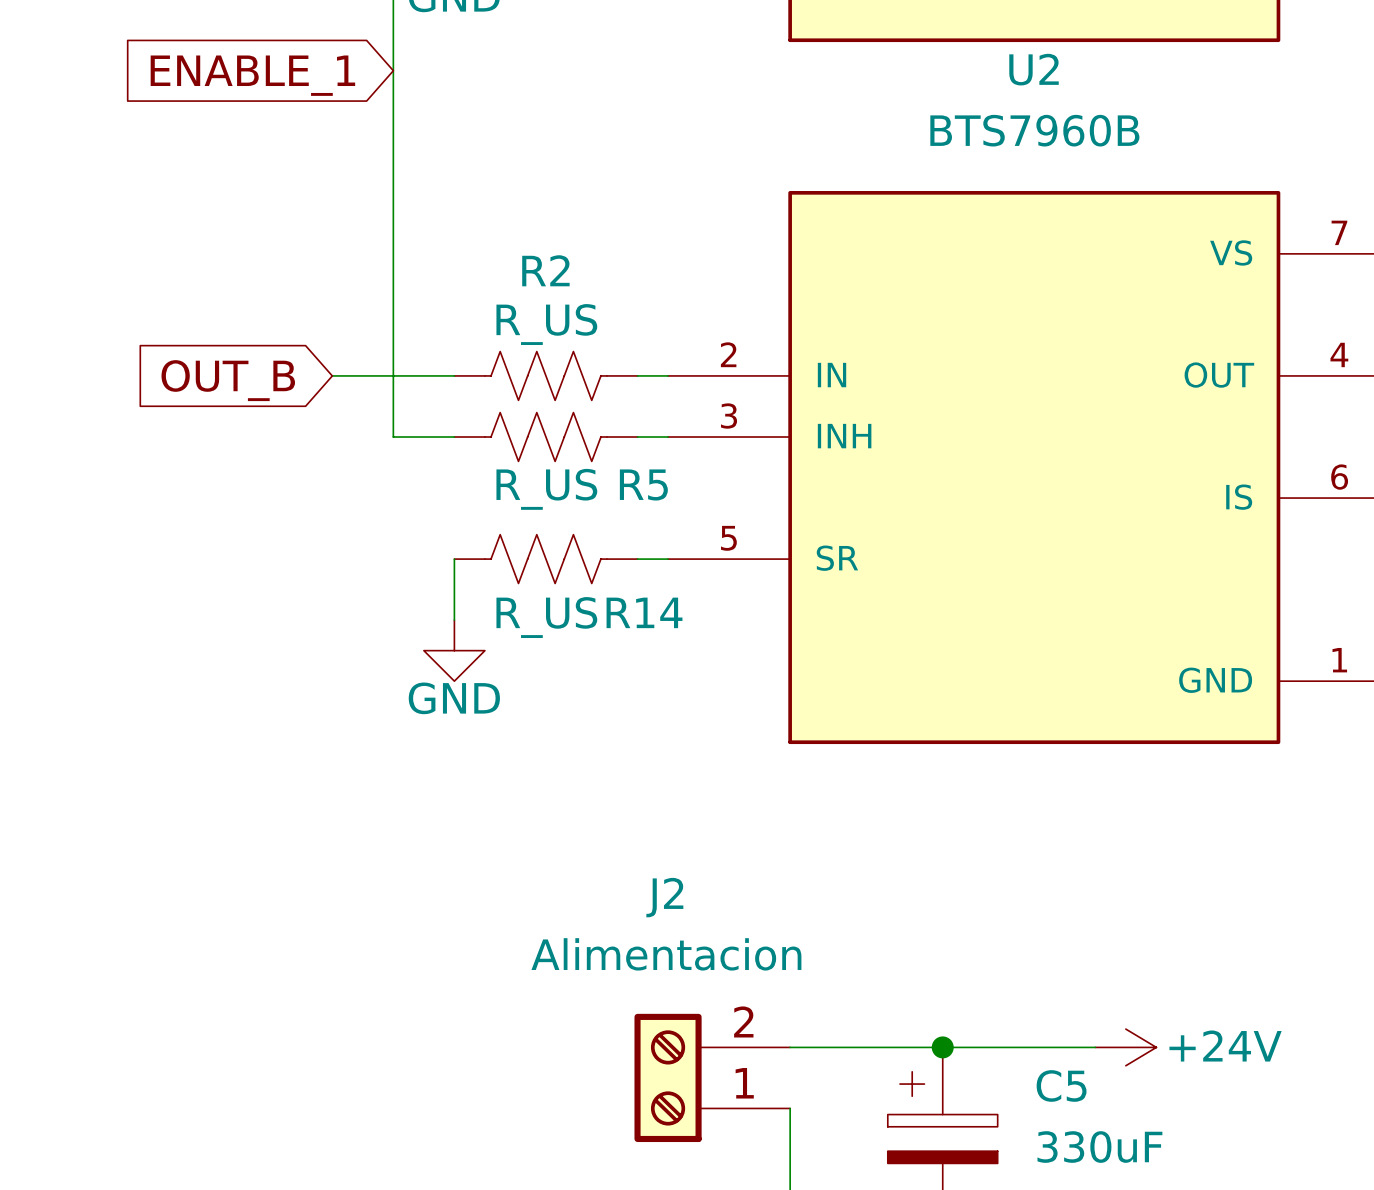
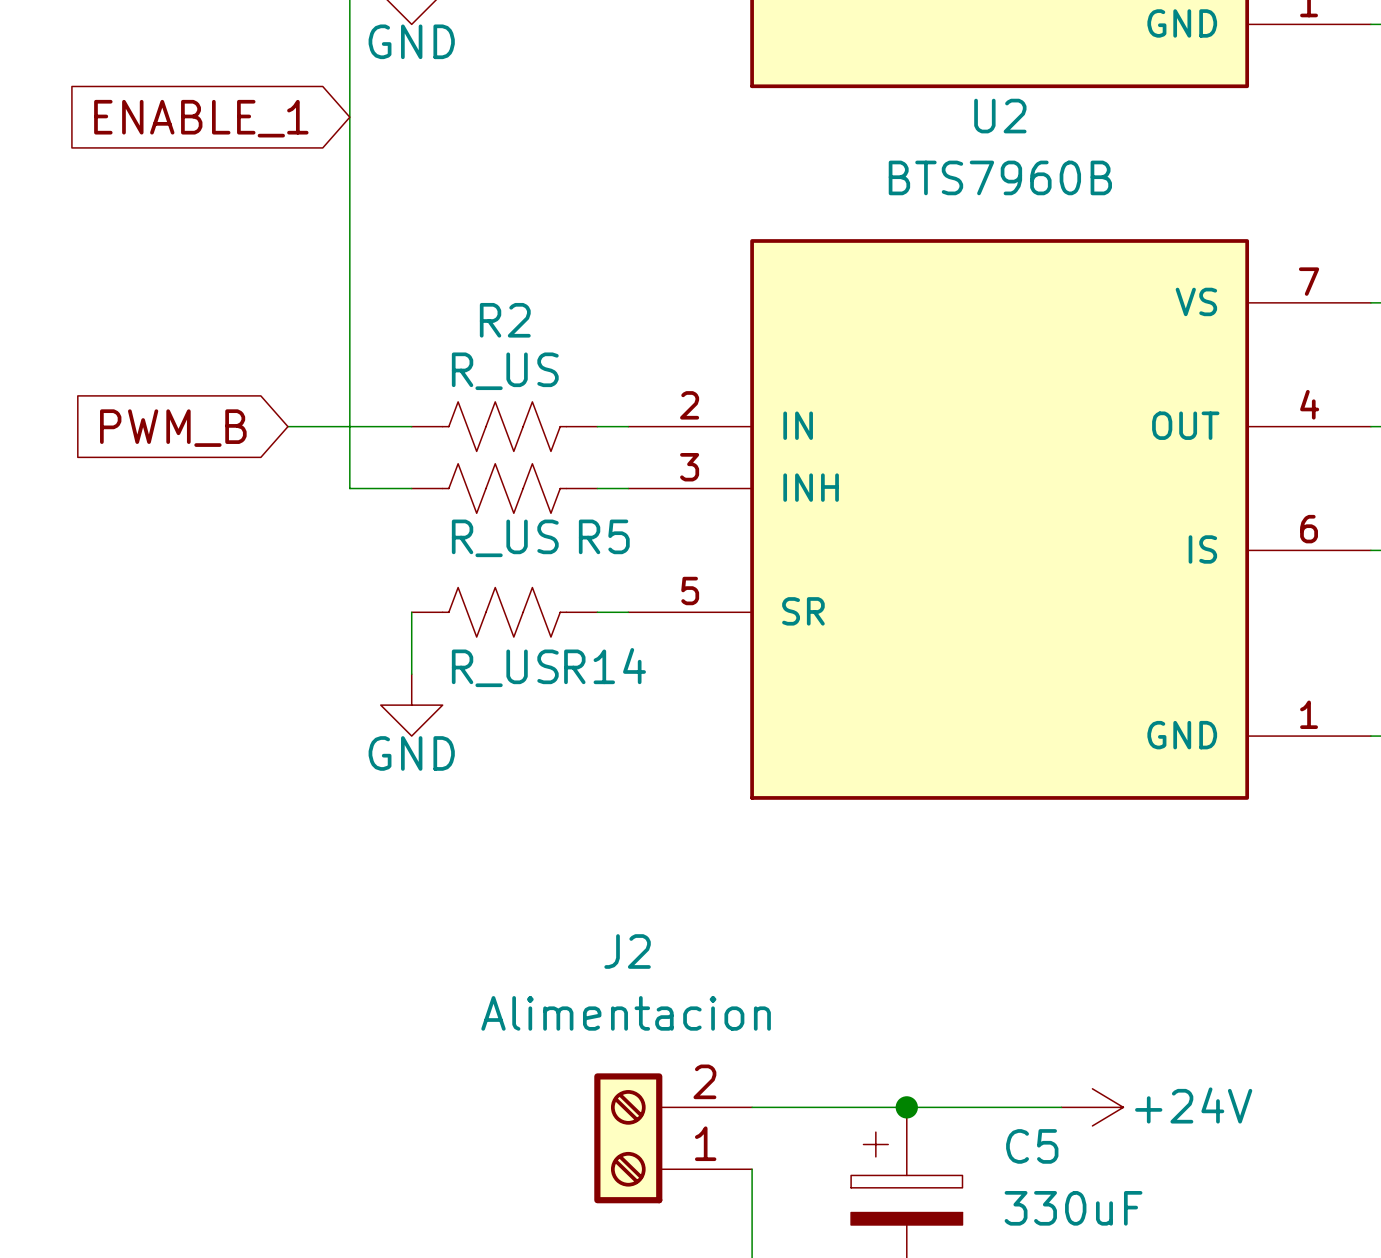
global label: OUT_B (228, 380) -> PWM_B (173, 428)

